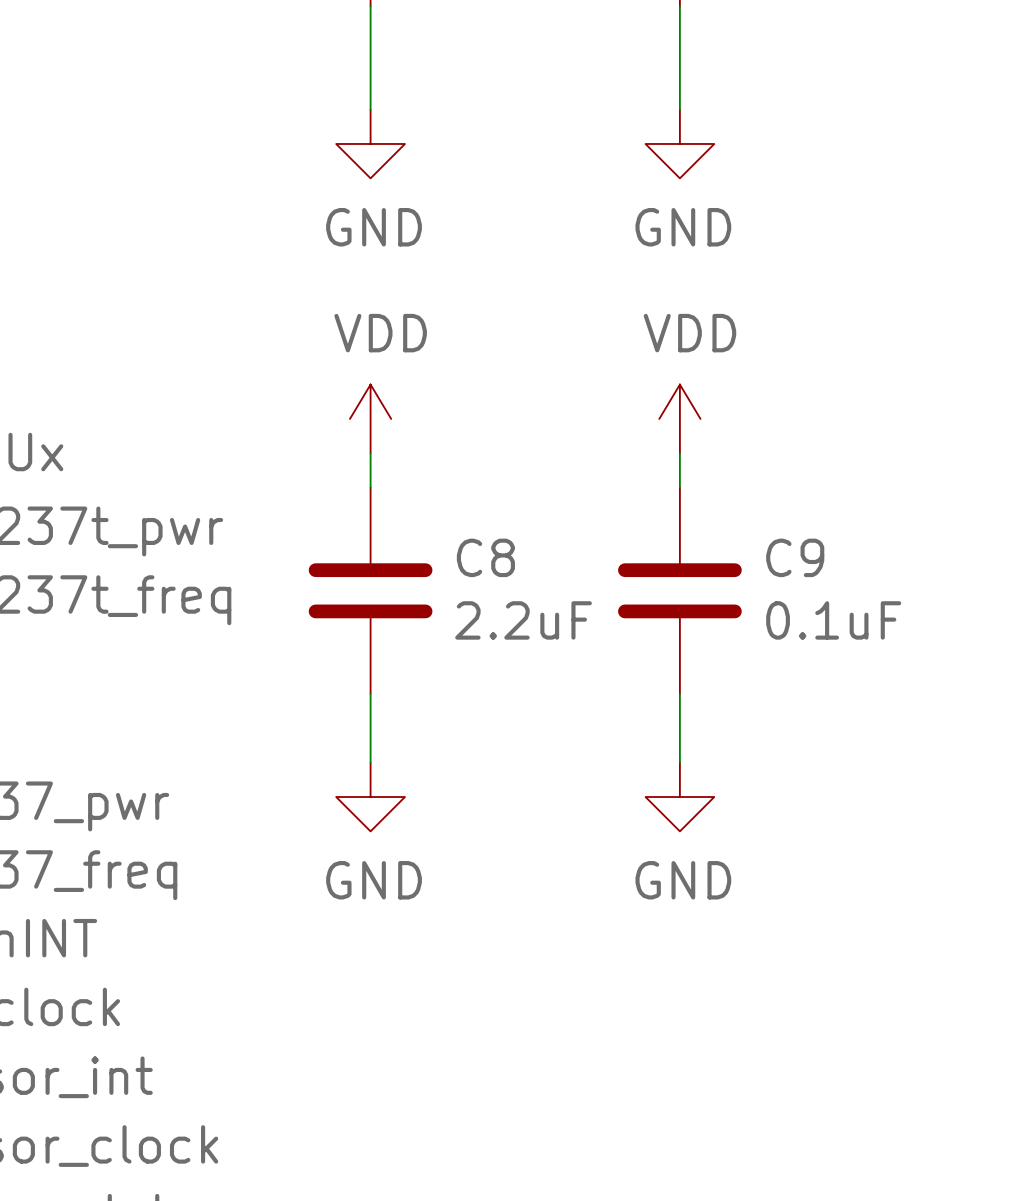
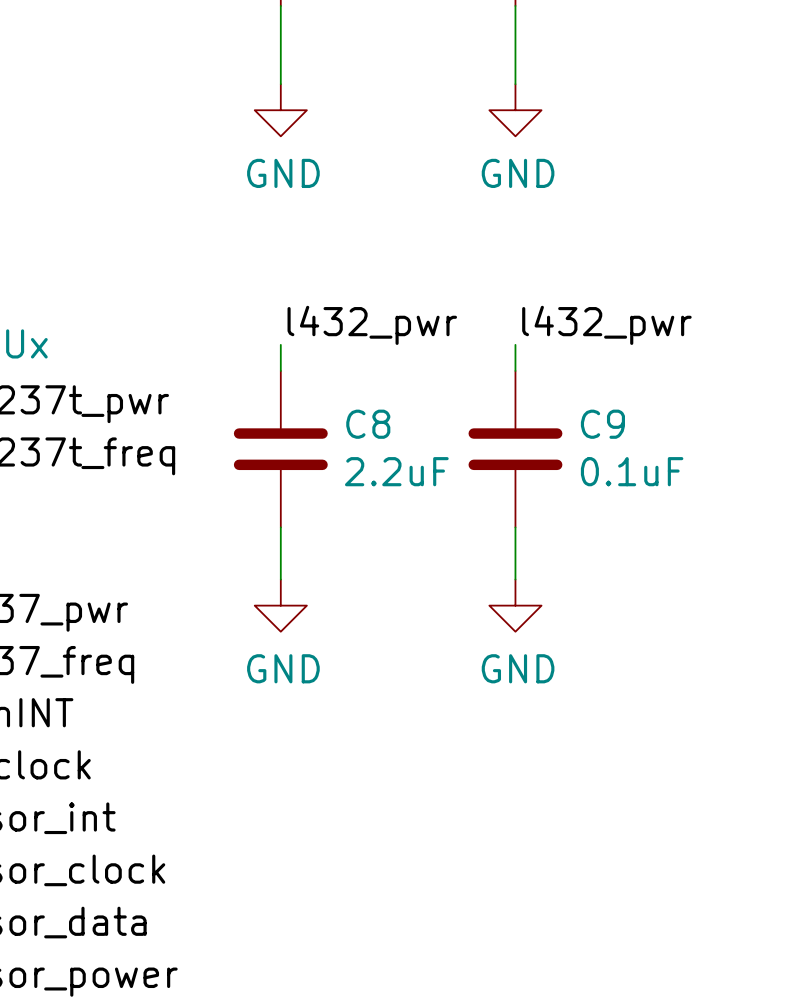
power symbol: VDD (370, 418) -> none
power symbol: VDD (679, 418) -> none
label: none -> l432_pwr (372, 325)
label: none -> l432_pwr (606, 325)

